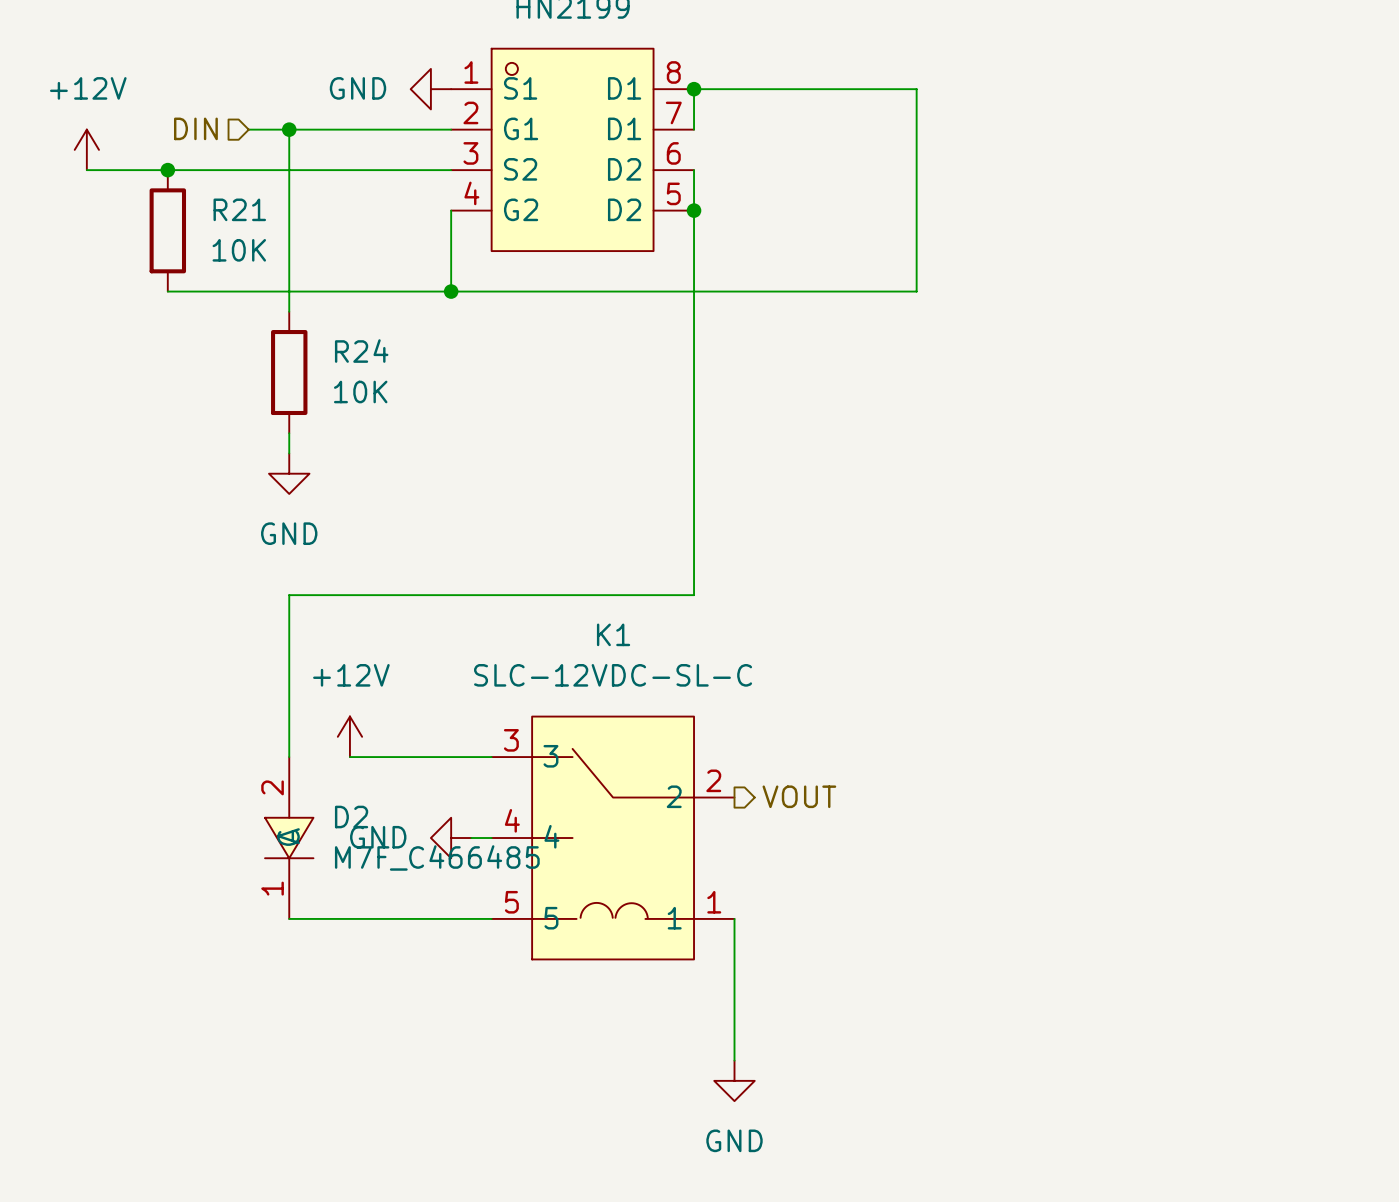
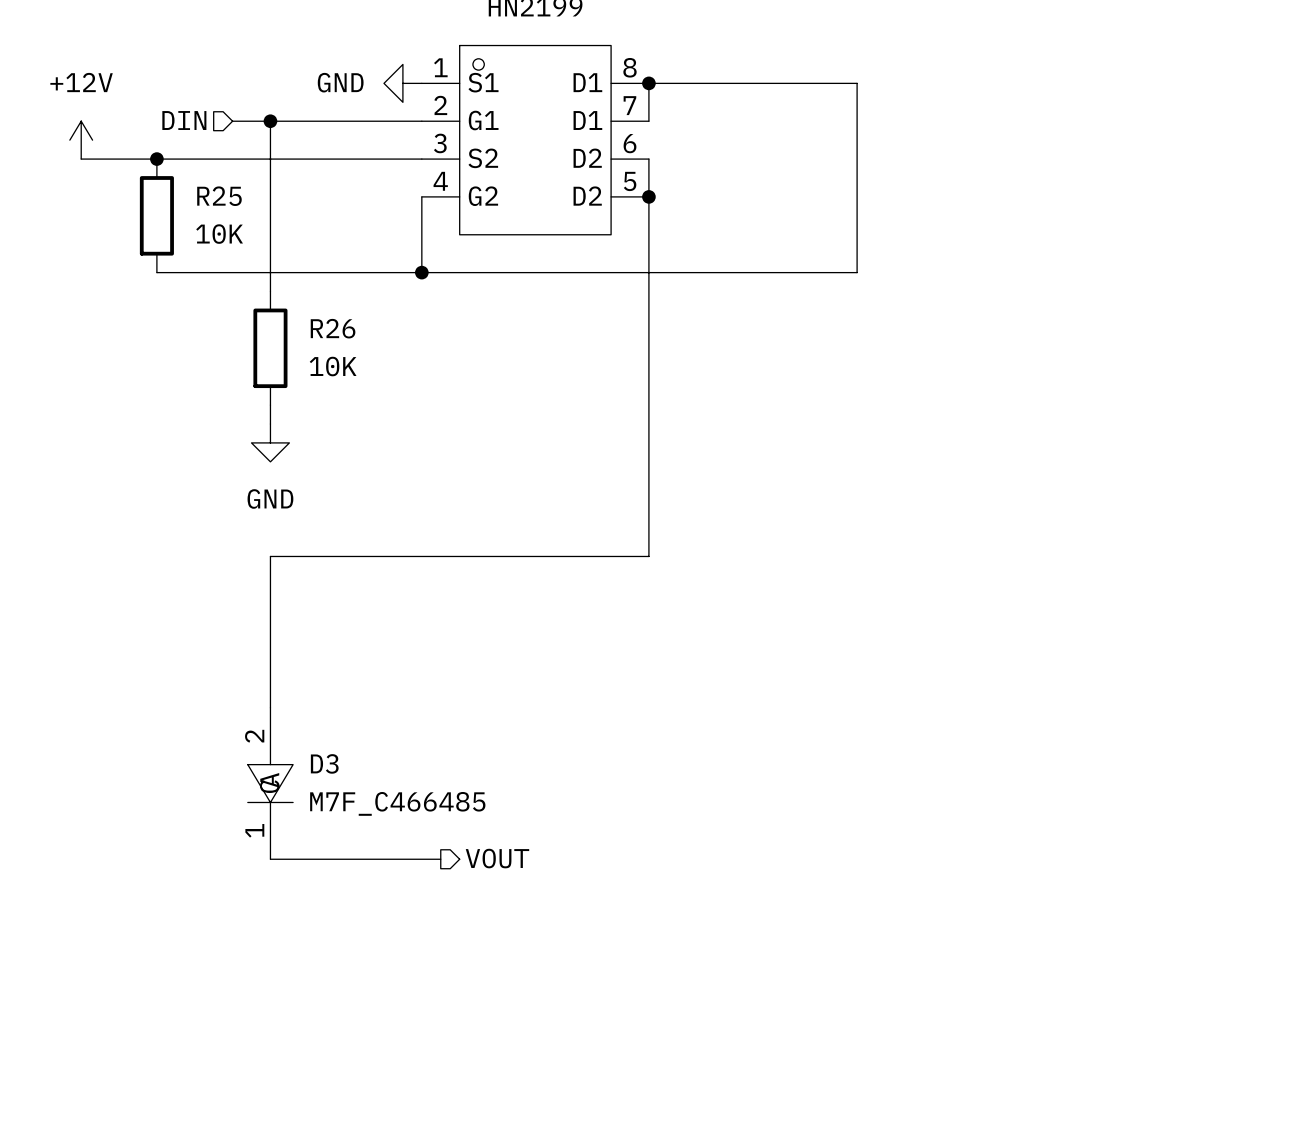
R21 name: R21 (239, 209) -> R25 (219, 196)
R24 name: R24 (361, 351) -> R26 (333, 328)
power symbol: +12V (349, 736) -> none
wire: (349, 757) (491, 757) -> none
hierarchical label position: VOUT (799, 796) -> VOUT (497, 858)
D2 name: D2 (351, 817) -> D3 (324, 763)
power symbol: GND (451, 838) -> none
wire: (471, 838) (491, 838) -> none
K1: SLC-12VDC-SL-C (613, 838) -> none
wire: (471, 918) (491, 918) -> none
wire: (734, 918) (734, 1060) -> none
power symbol: GND (734, 1080) -> none

